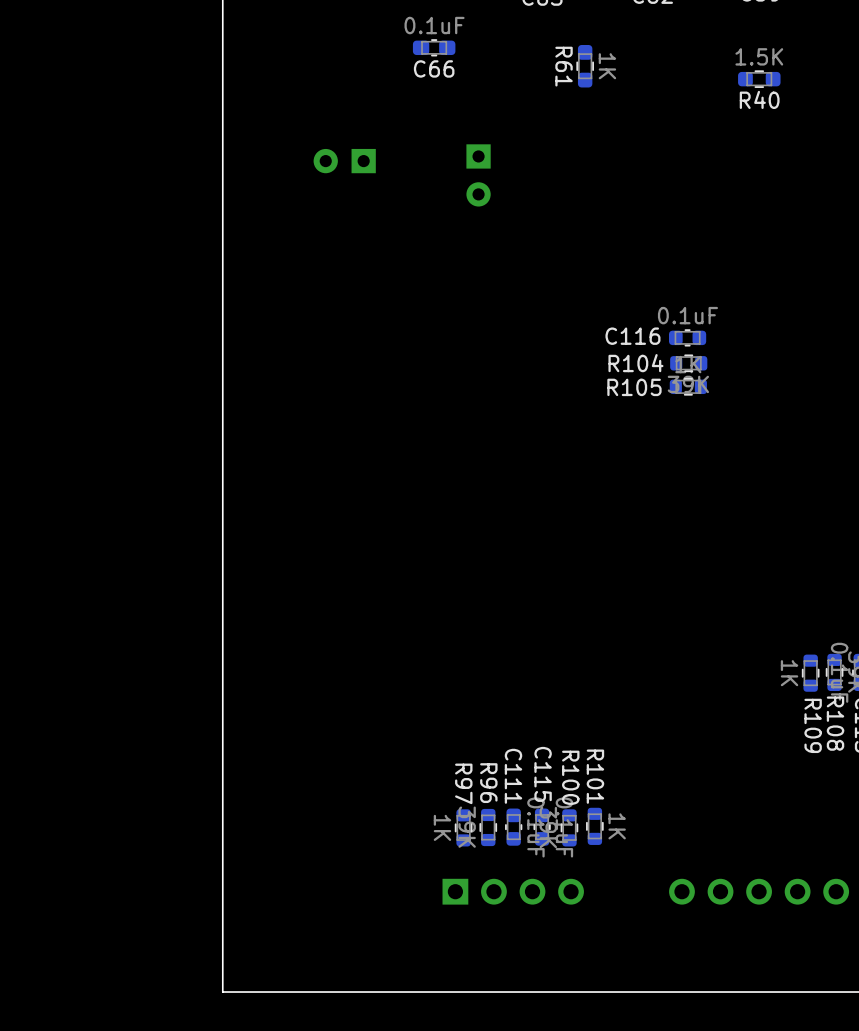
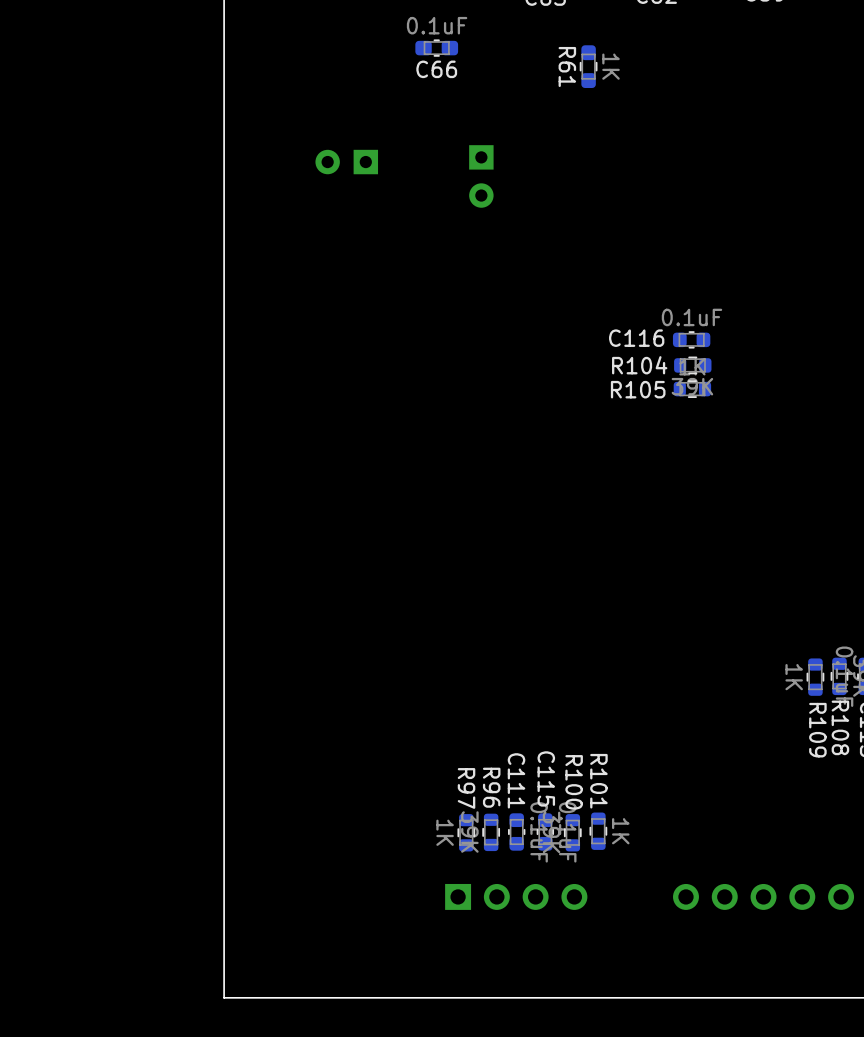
R40: 1.5K (759, 79) -> none

